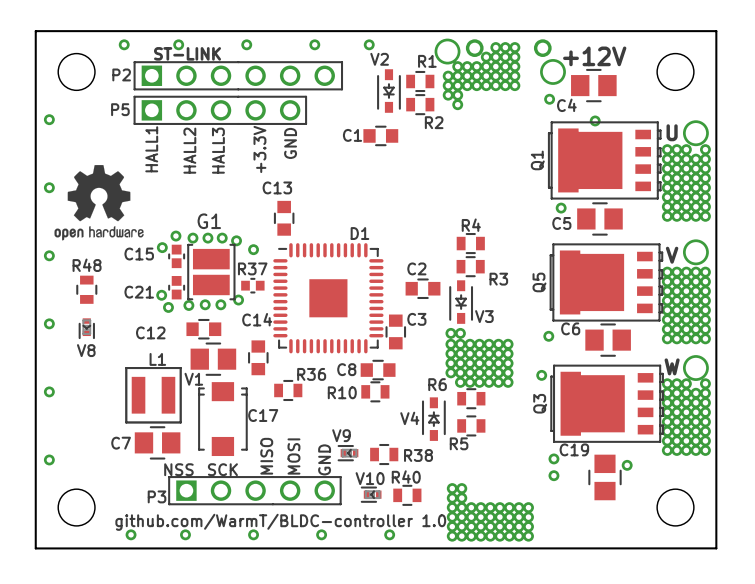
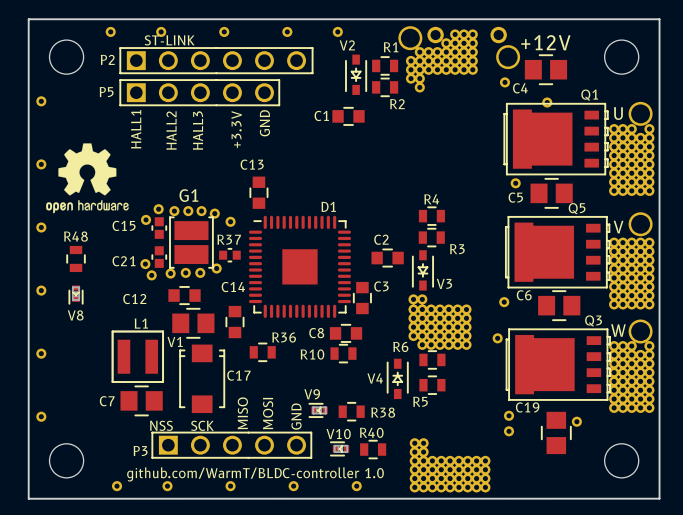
Q1 name rotation: 0° (537, 160) -> 90° clockwise (589, 95)
Q1 name position: Q1 (537, 160) -> Q1 (589, 95)
Q5 name rotation: 0° (539, 282) -> 90° clockwise (577, 208)
Q5 name position: Q5 (539, 282) -> Q5 (577, 208)
Q3 name rotation: 0° (540, 403) -> 90° clockwise (593, 320)
Q3 name position: Q3 (540, 403) -> Q3 (593, 320)

